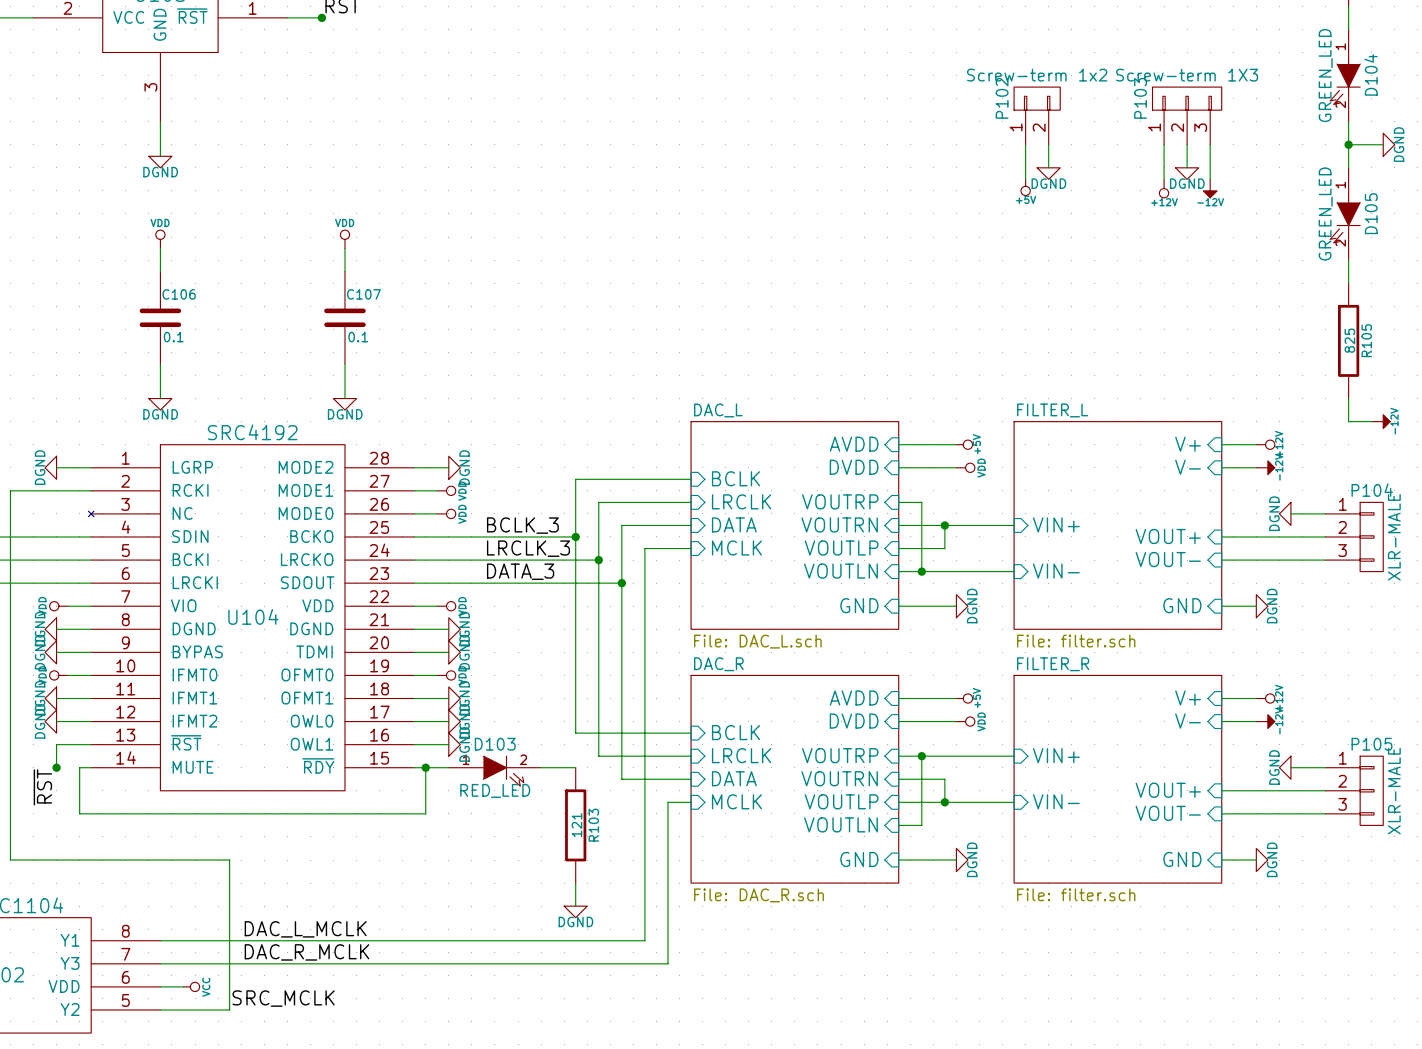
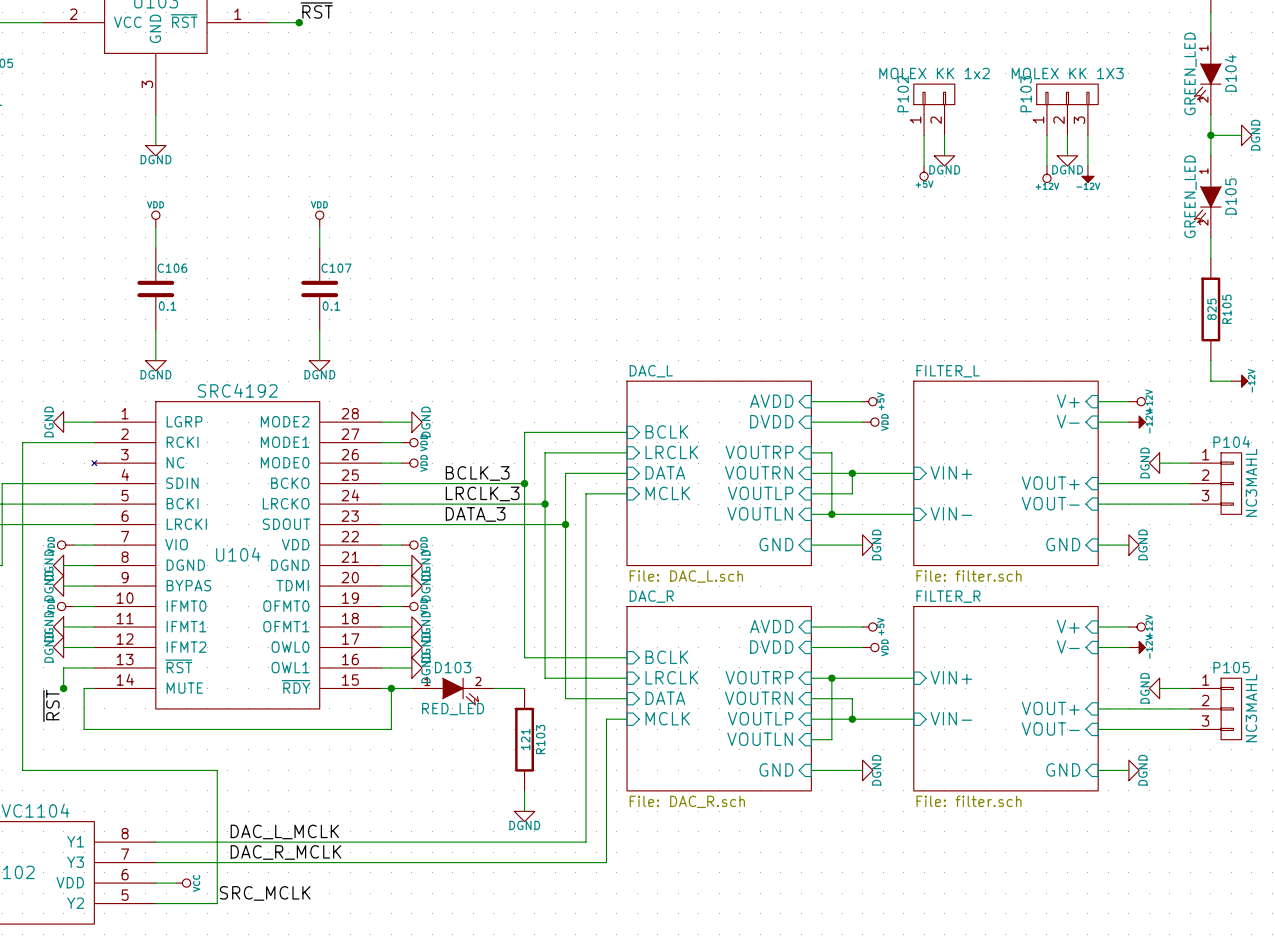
P102 value: Screw-term 1x2 (1037, 75) -> MOLEX KK 1x2 (934, 73)
P103 value: Screw-term 1X3 (1187, 75) -> MOLEX KK 1X3 (1067, 73)
P104 value: XLR-MALE (1394, 537) -> NC3MAHL (1251, 482)
P105 value: XLR-MALE (1394, 791) -> NC3MAHL (1251, 708)

